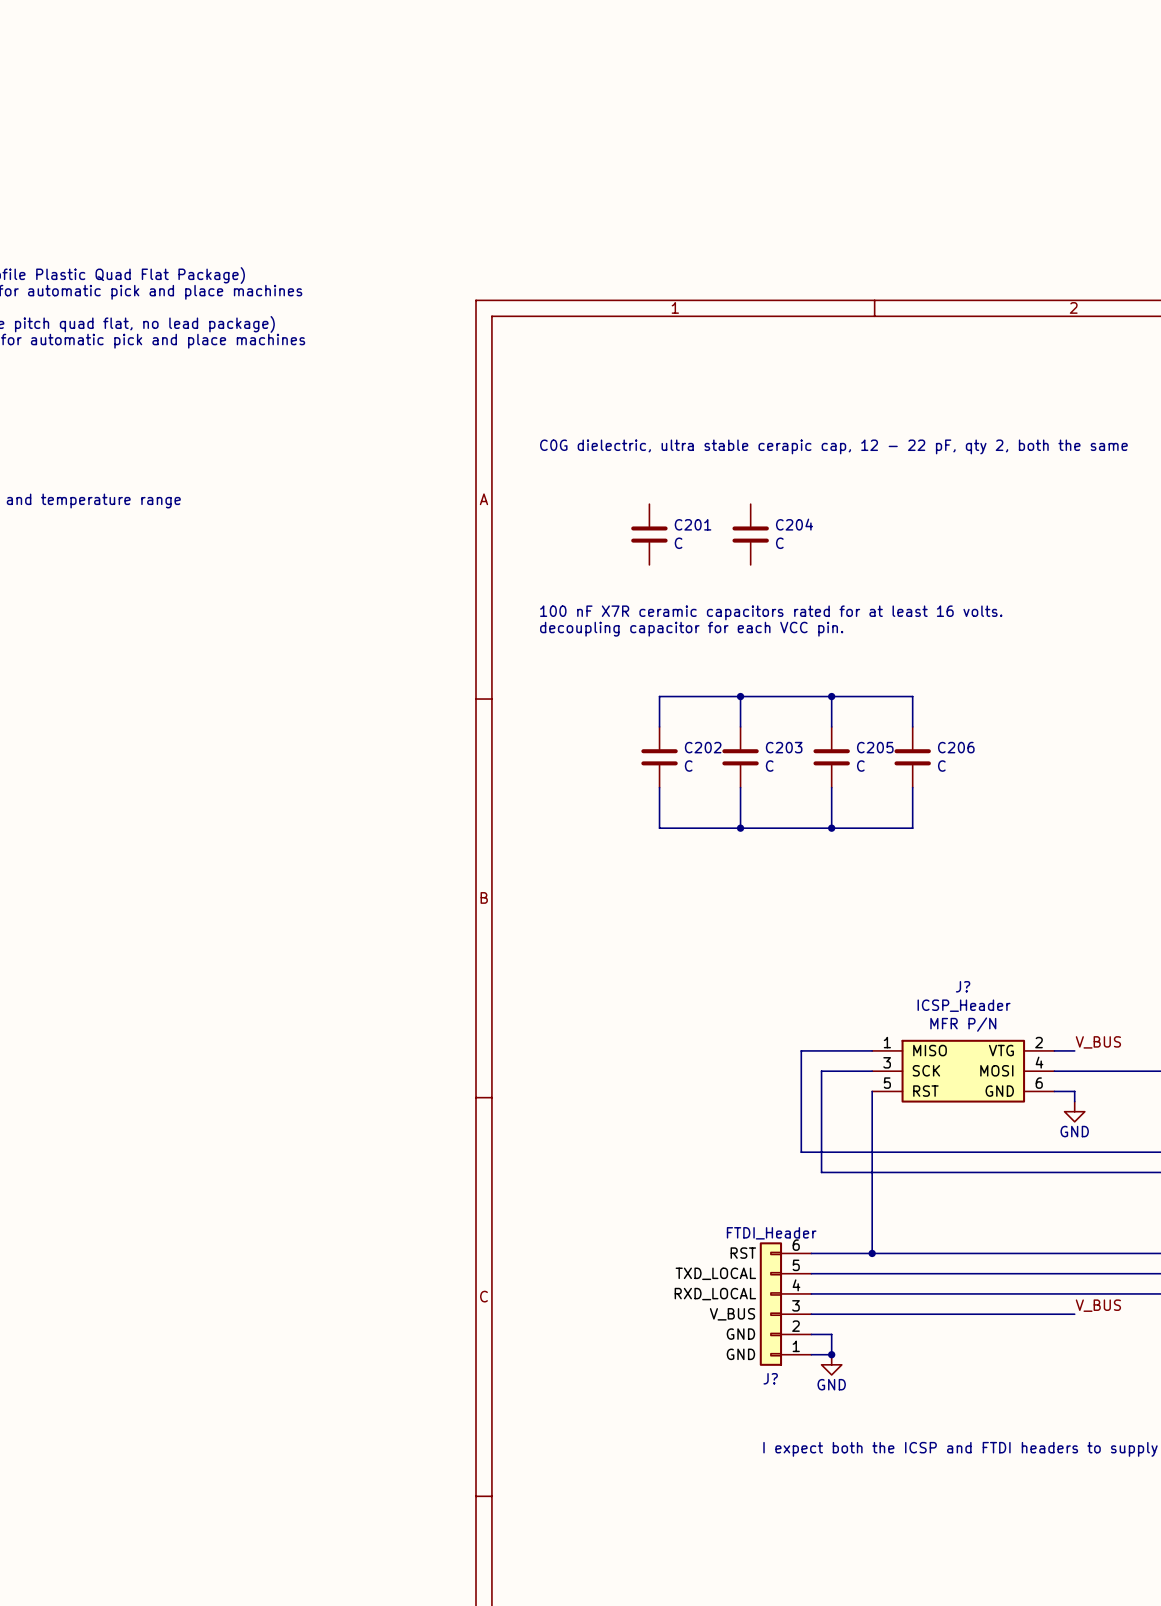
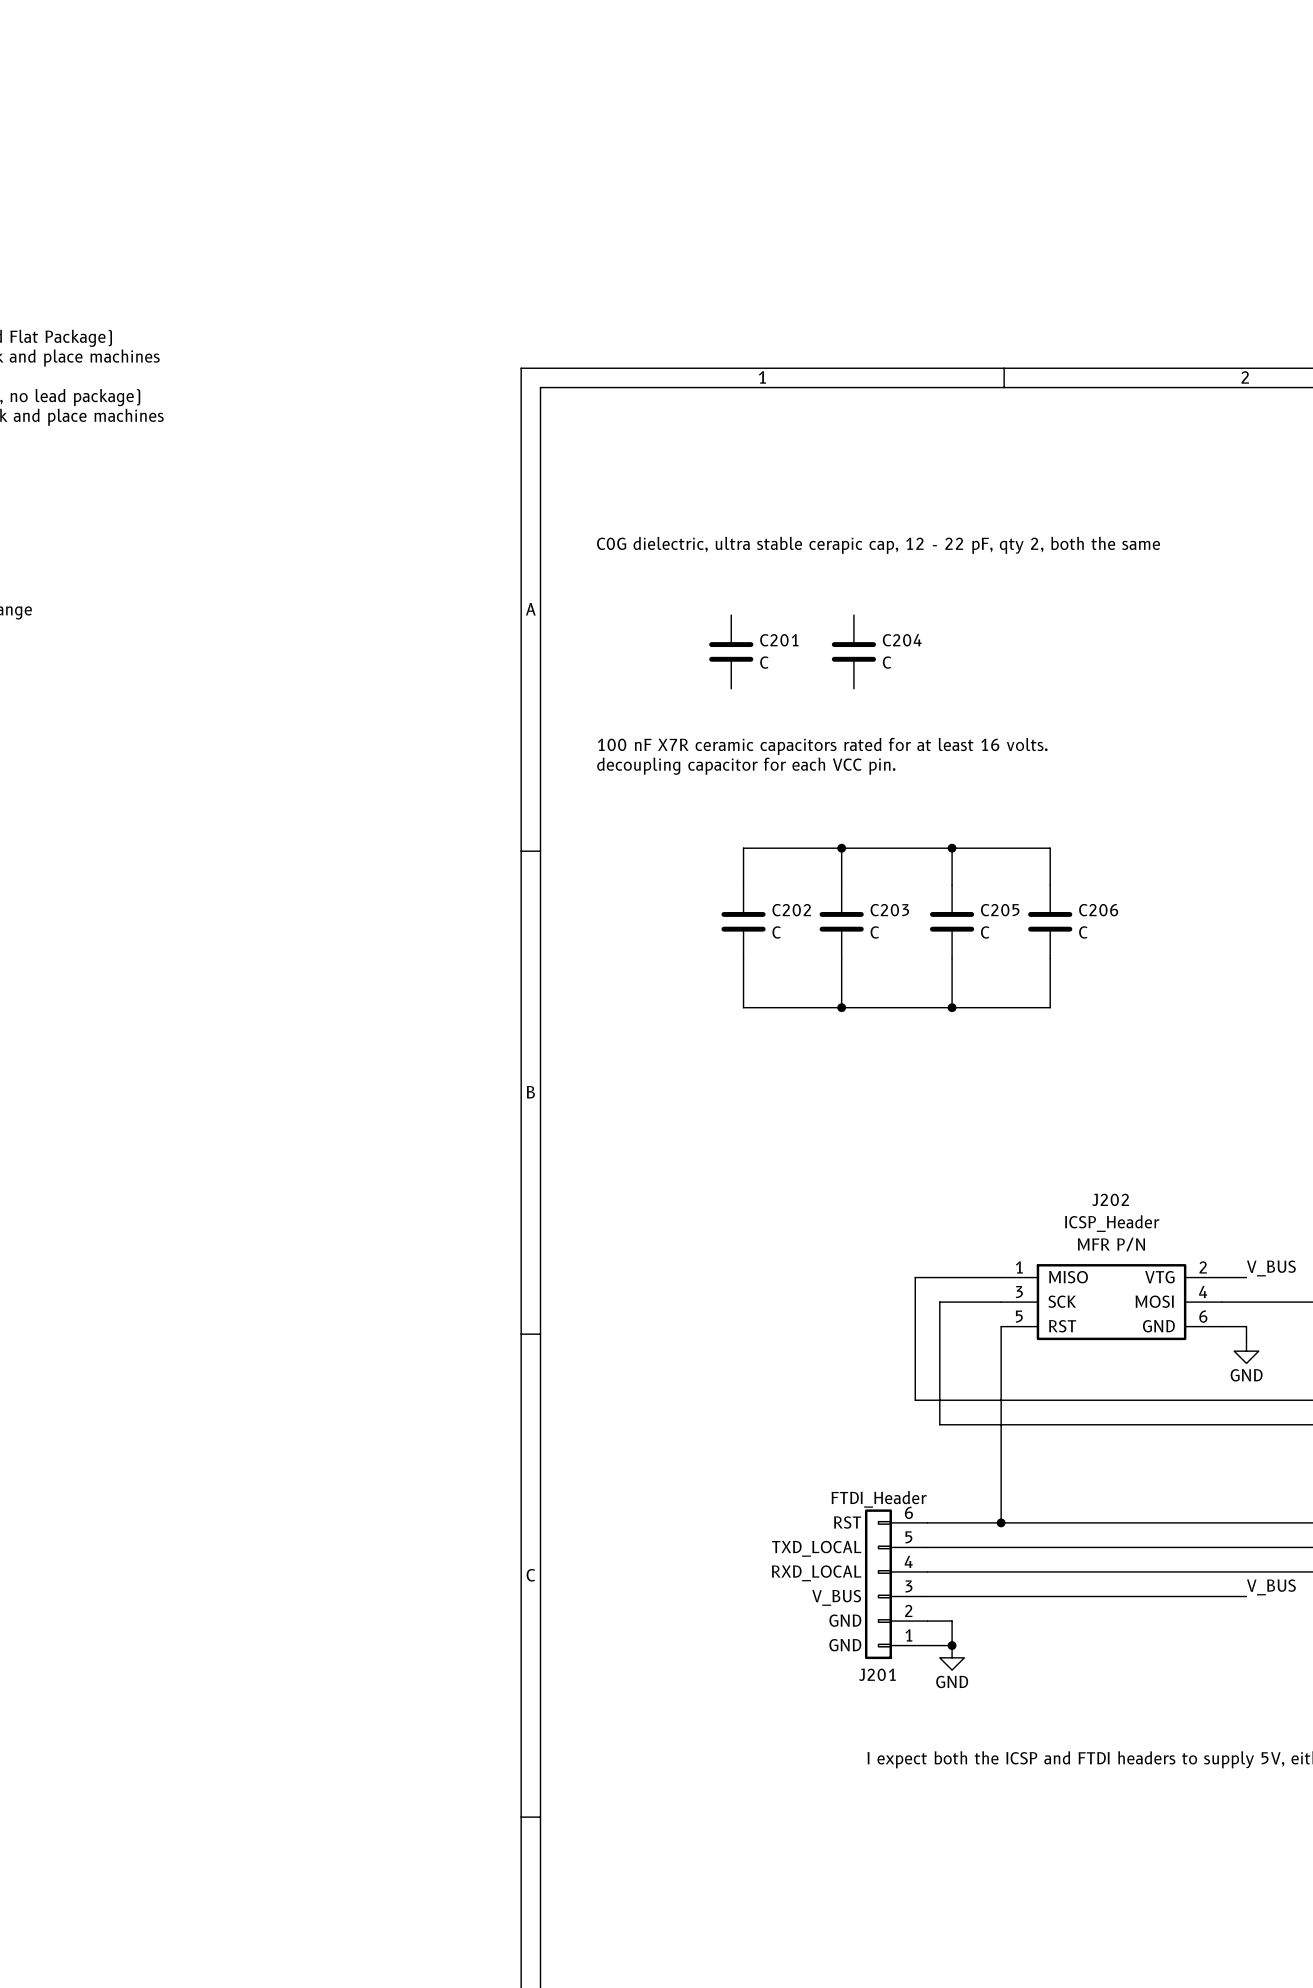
J? name: J? (963, 986) -> J202 (1110, 1199)
J? name: J? (770, 1378) -> J201 (877, 1674)

